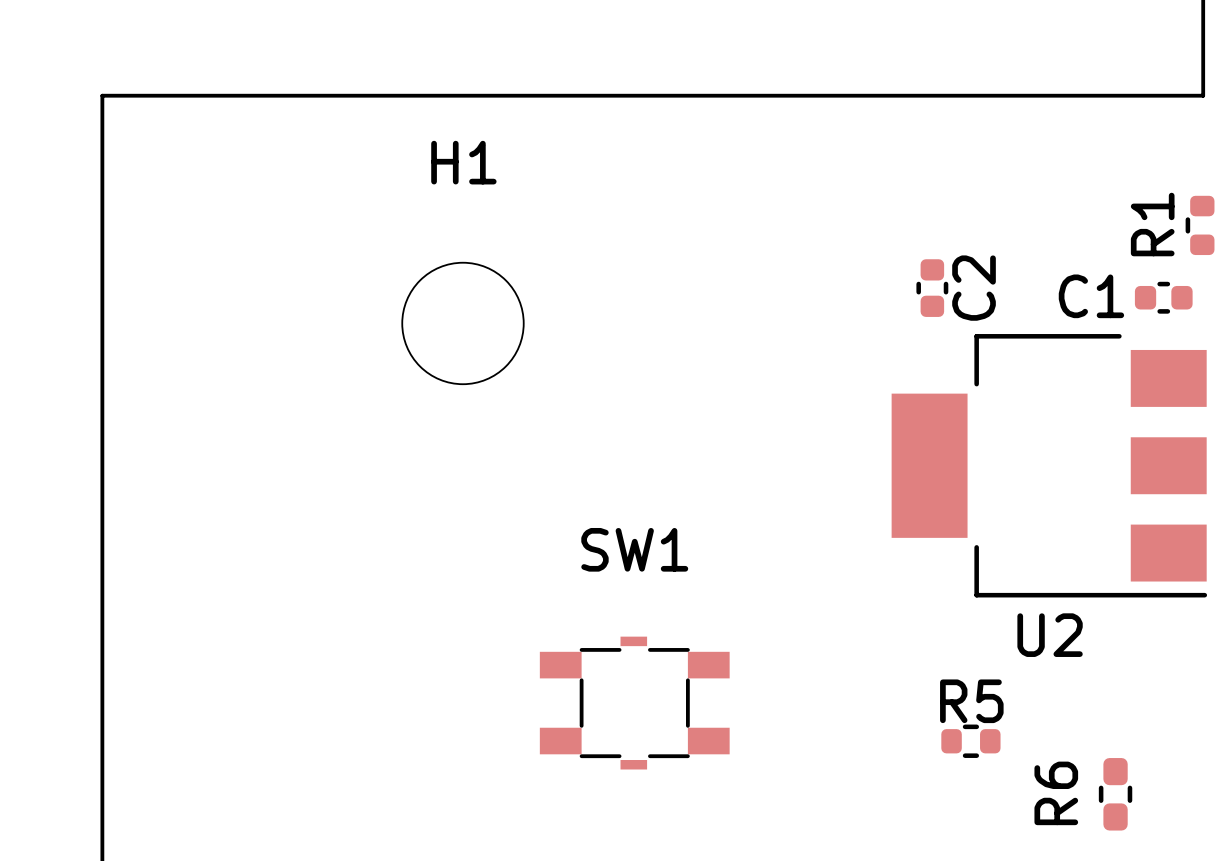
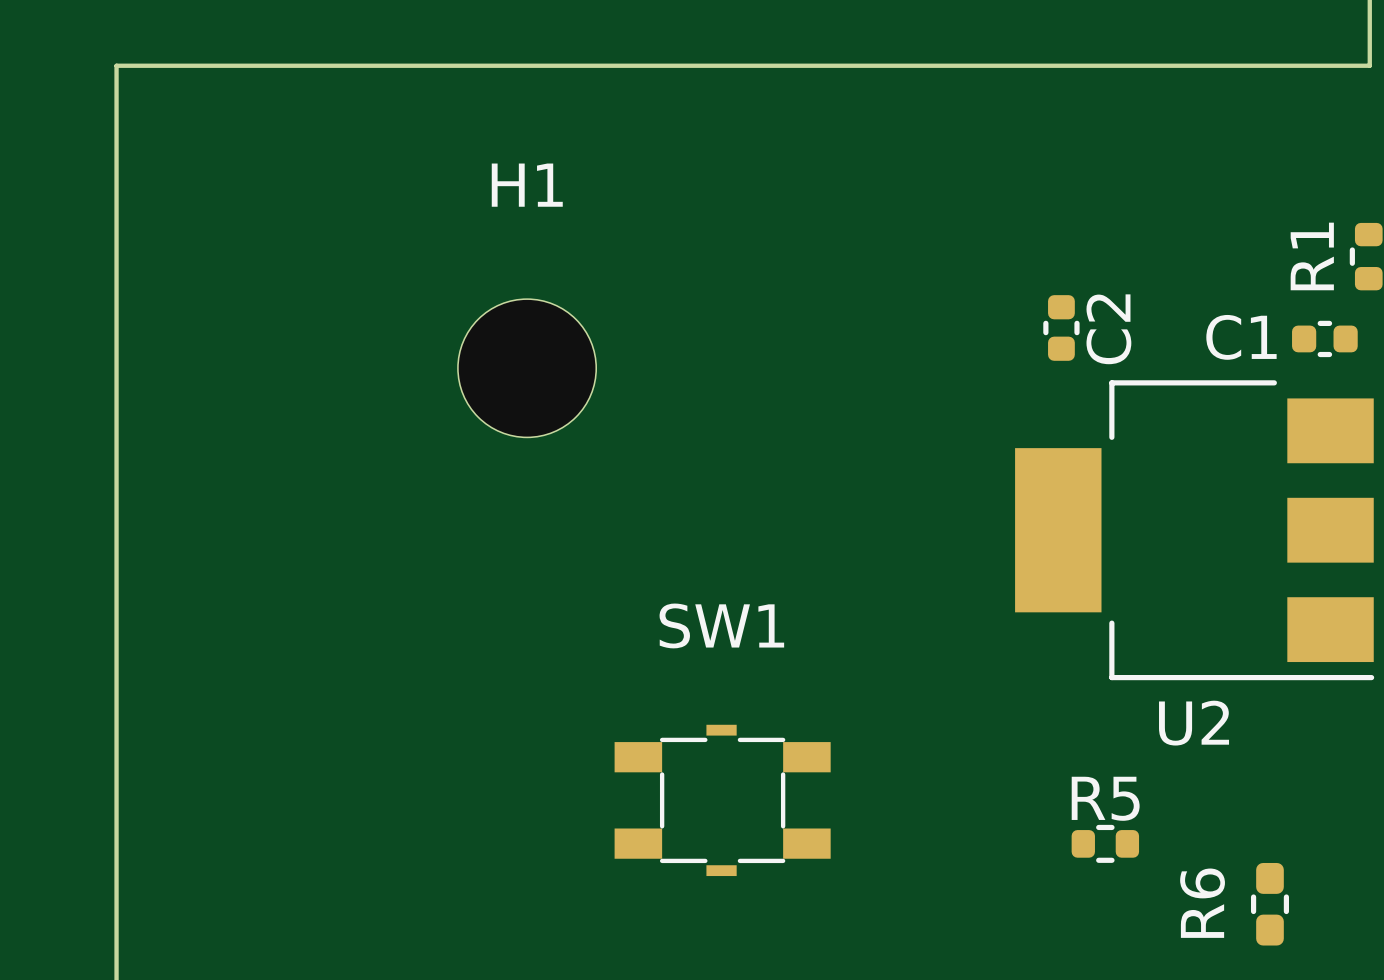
board edge: (1203, 57) (1203, 95) (102, 95) -> (1369, 65) (116, 65) (116, 108)

